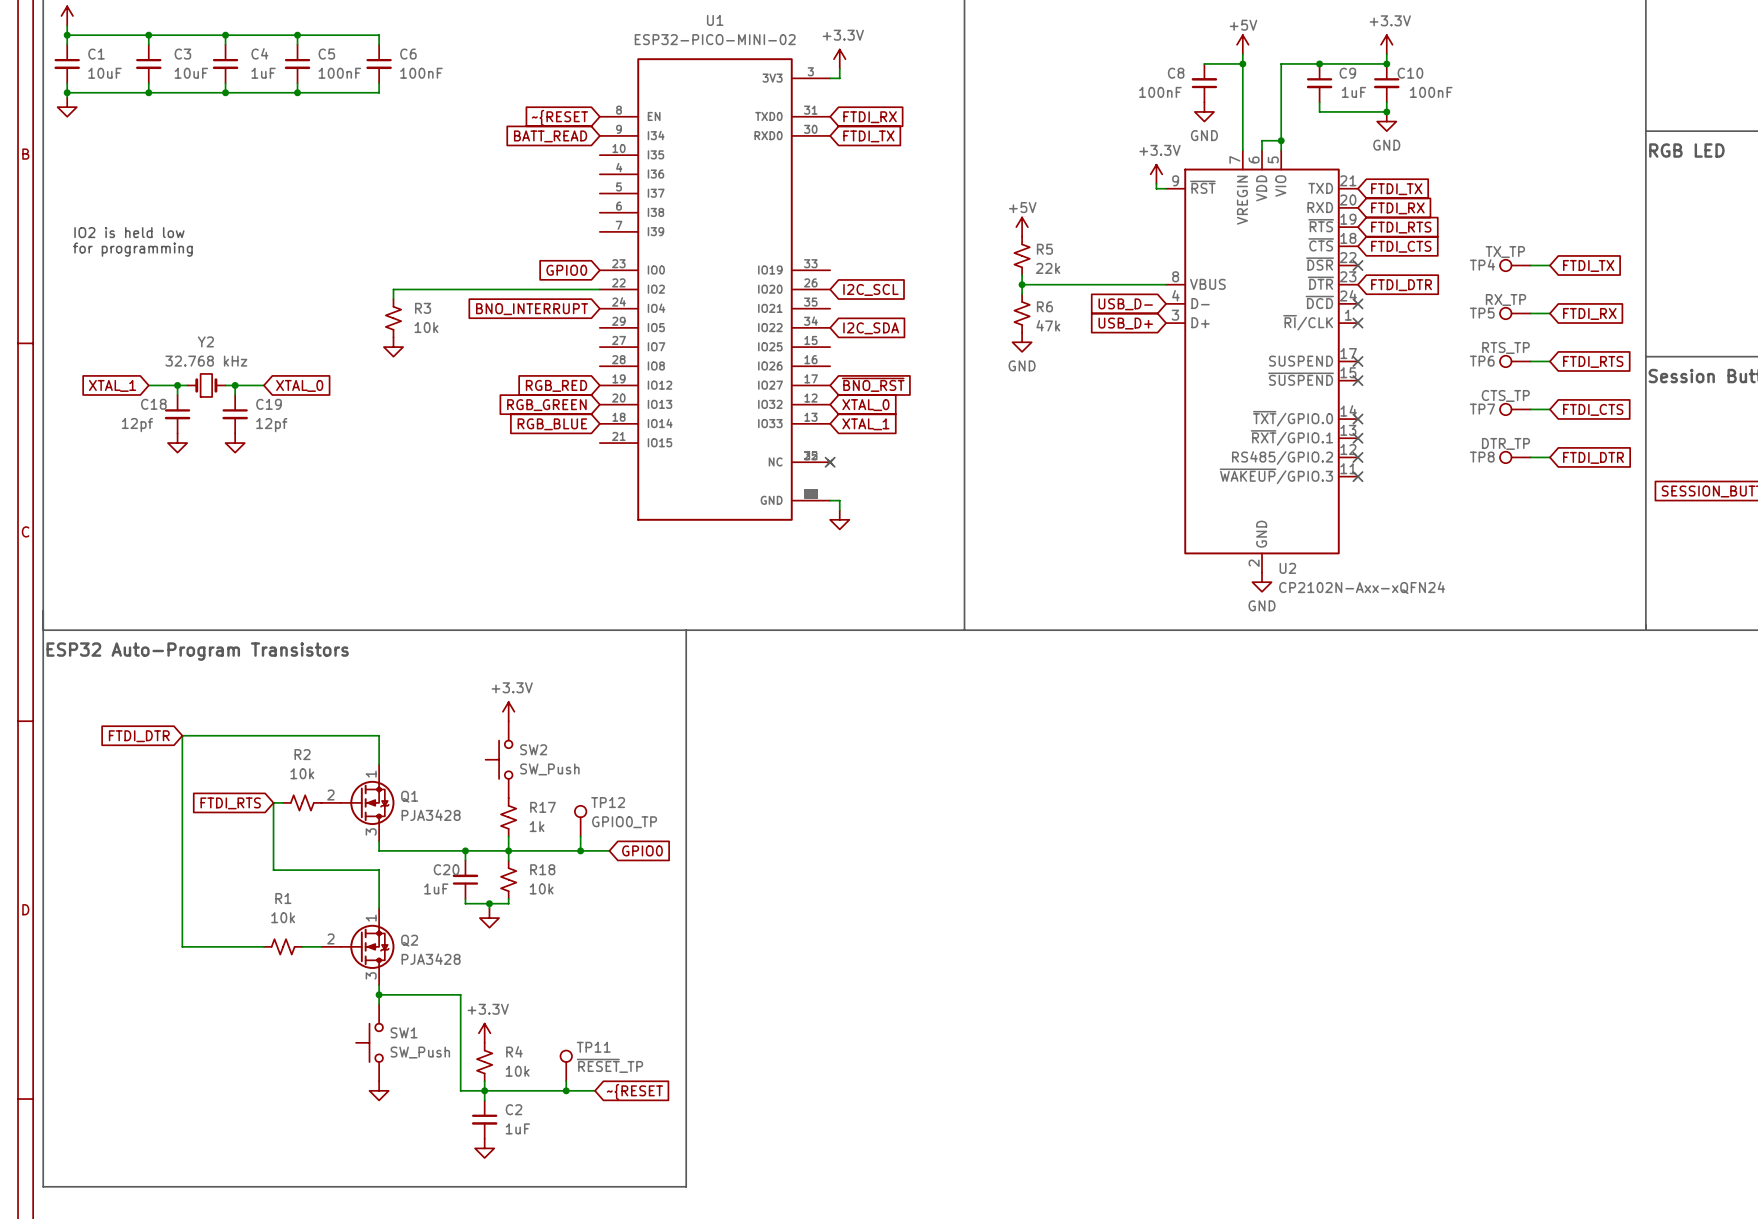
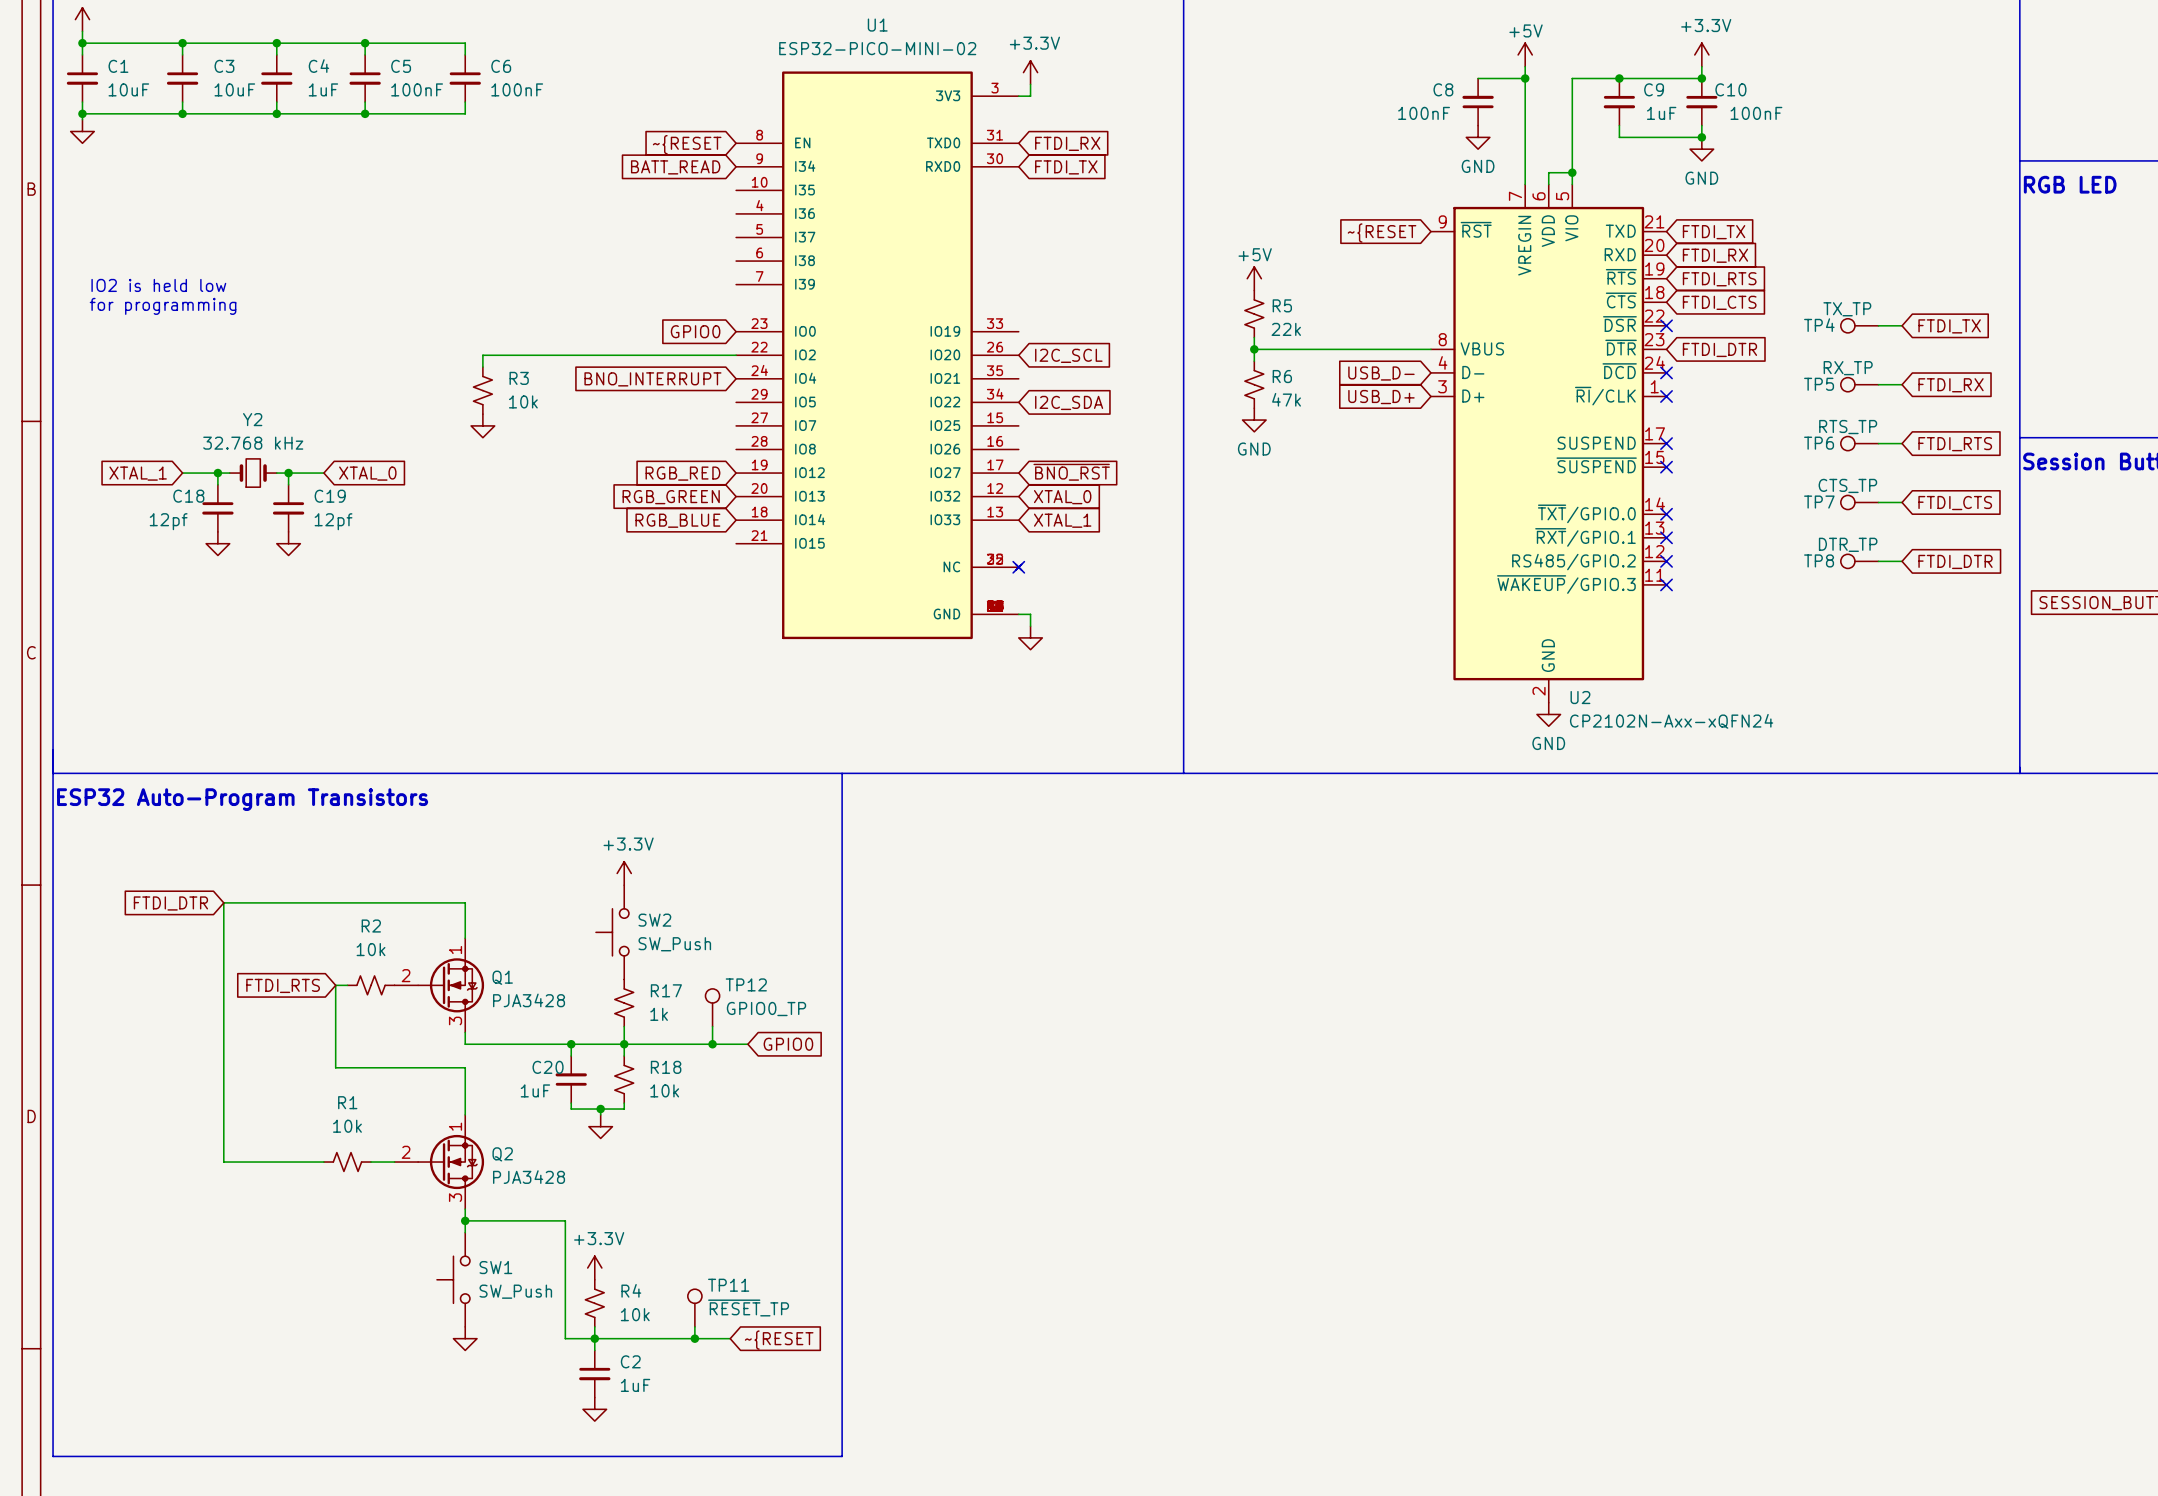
power symbol: +3.3V (1156, 174) -> none
wire: (1156, 183) (1156, 188) (1166, 188) -> none
global label: none -> ~{RESET (1382, 233)

